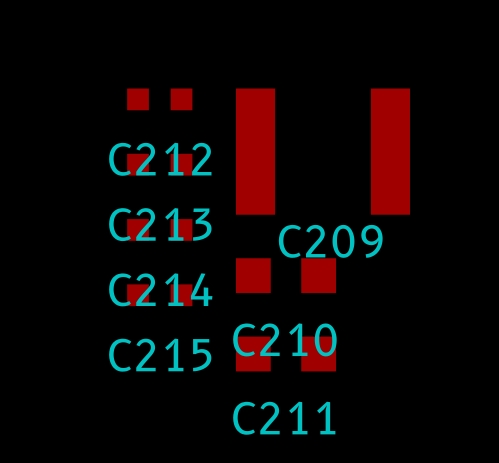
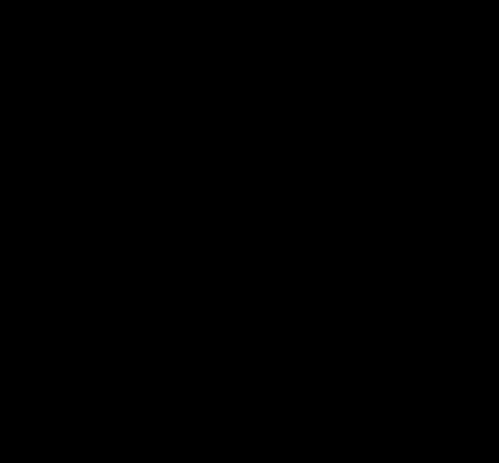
C212: (159, 99) -> none
C209: (322, 151) -> none
C213: (159, 164) -> none
C214: (159, 229) -> none
C210: (285, 275) -> none
C215: (159, 295) -> none
C211: (285, 353) -> none

